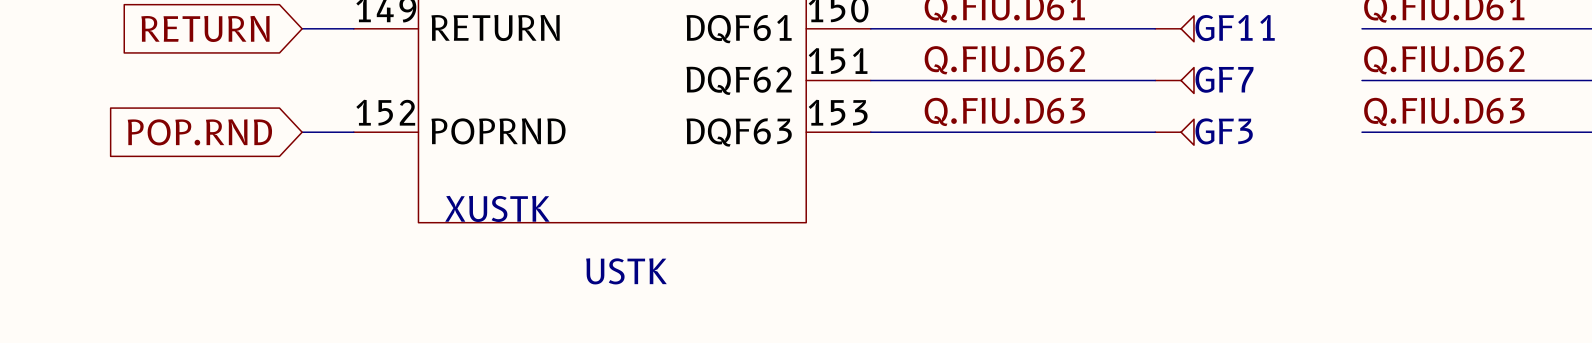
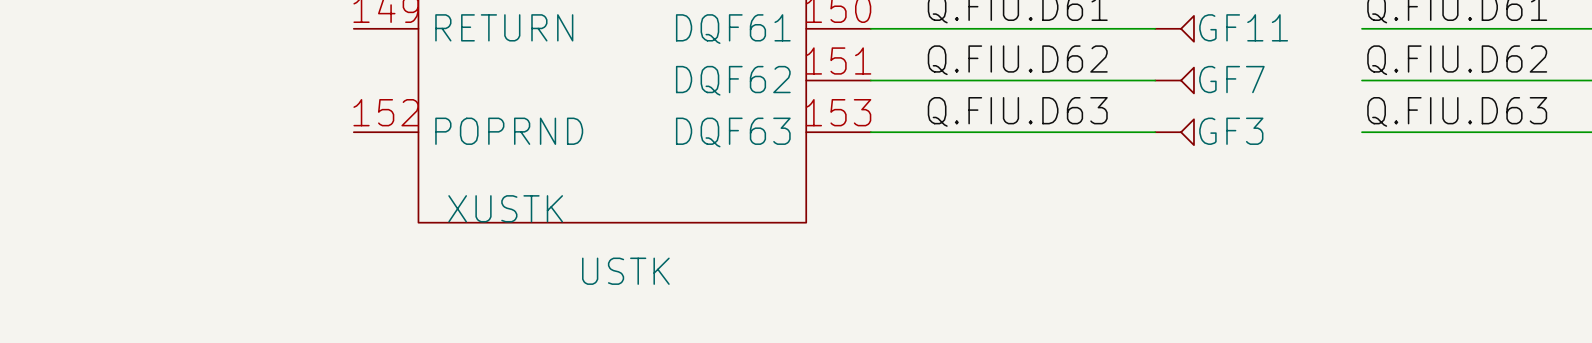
global label: RETURN (205, 28) -> none
wire: (302, 28) (353, 28) -> none
global label: POP.RND (199, 132) -> none
wire: (302, 132) (353, 132) -> none

